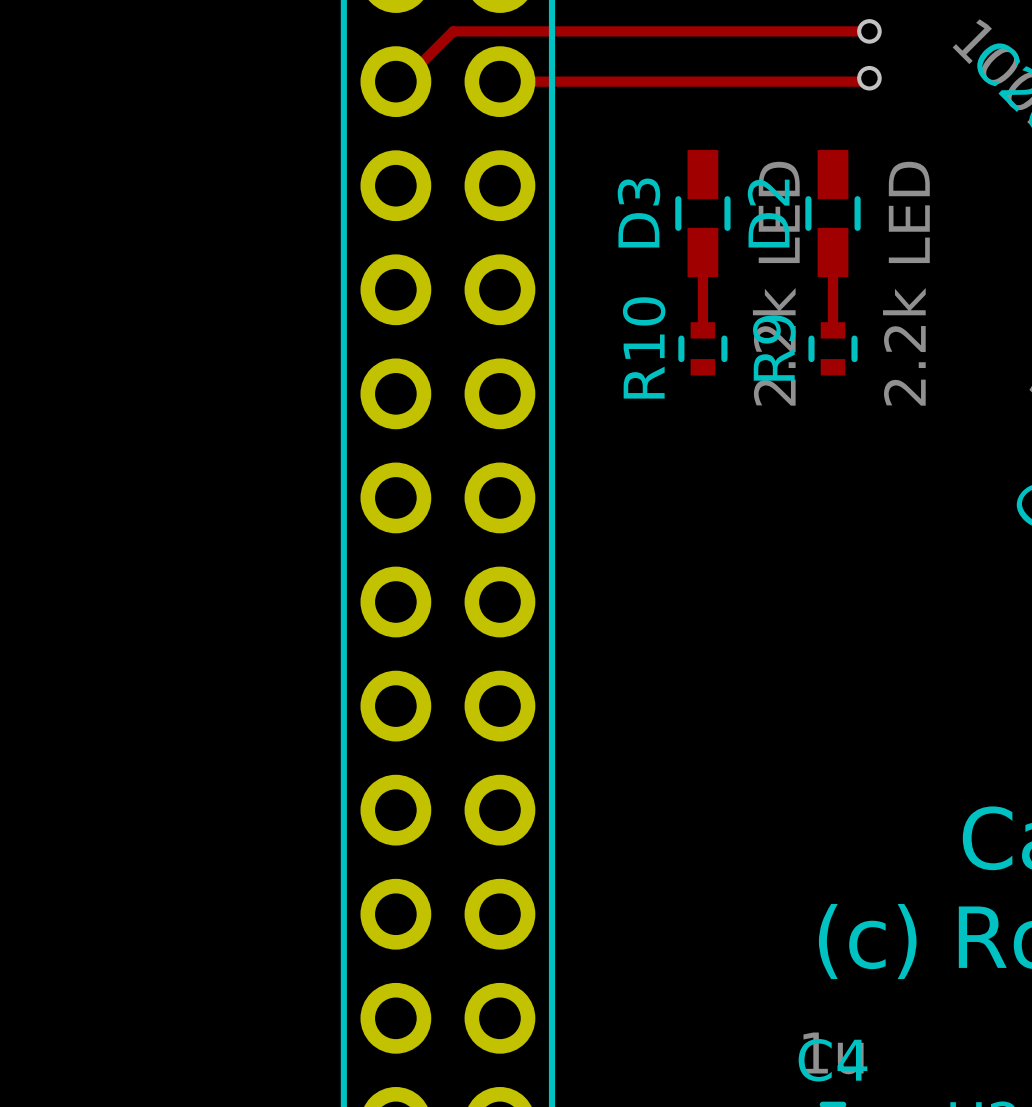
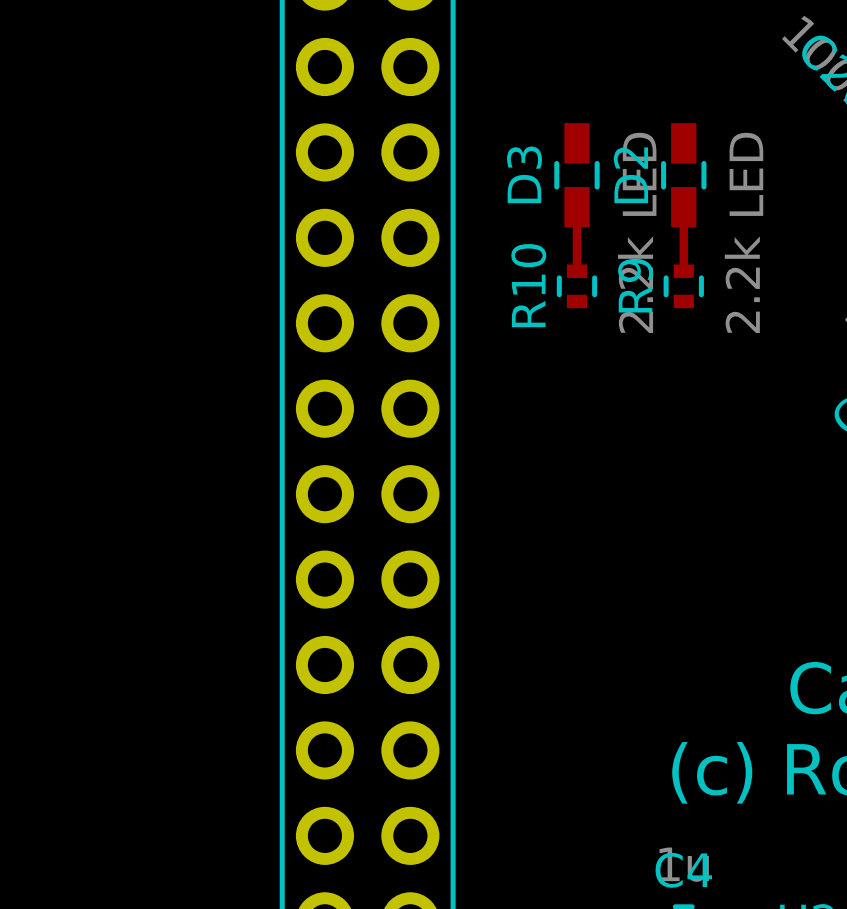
track: (869, 31) (453, 31) (402, 81) (395, 81) -> none
via: (869, 31) -> none
track: (869, 78) (866, 81) (499, 81) -> none
via: (869, 78) -> none

